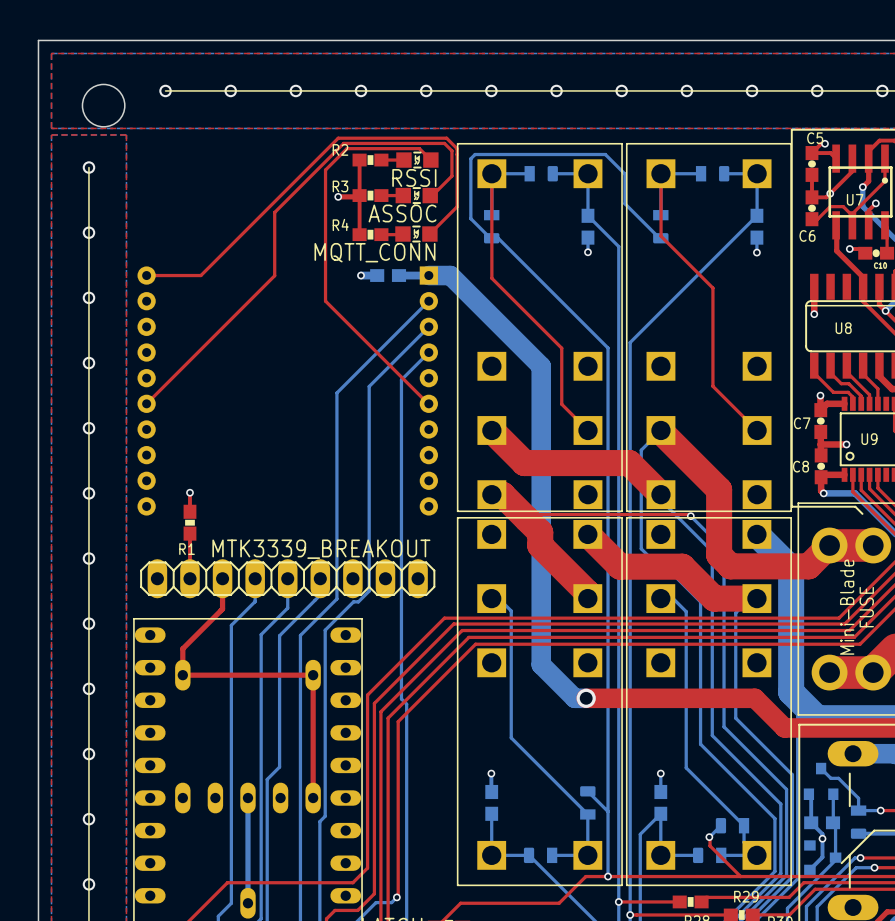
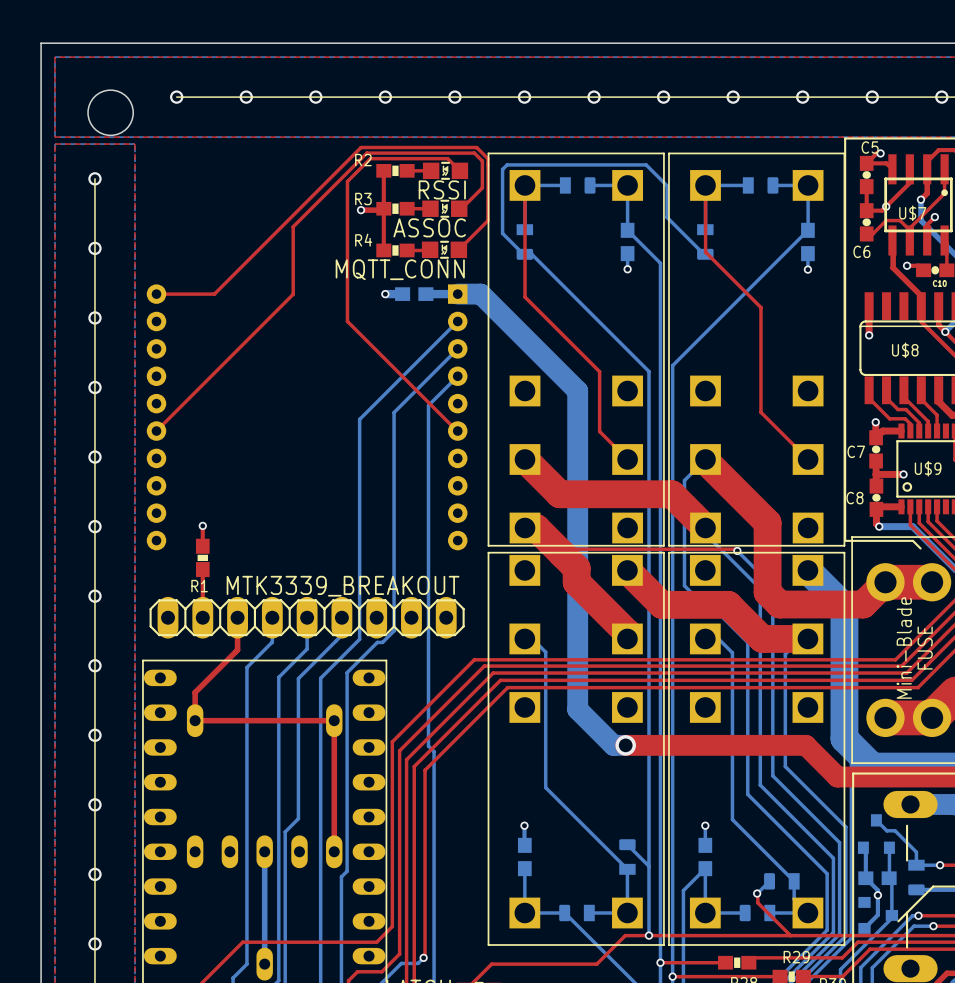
U7 name: U7 (855, 199) -> U$7 (912, 213)
U8 name: U8 (843, 328) -> U$8 (905, 350)
U9 name: U9 (869, 439) -> U$9 (928, 468)

